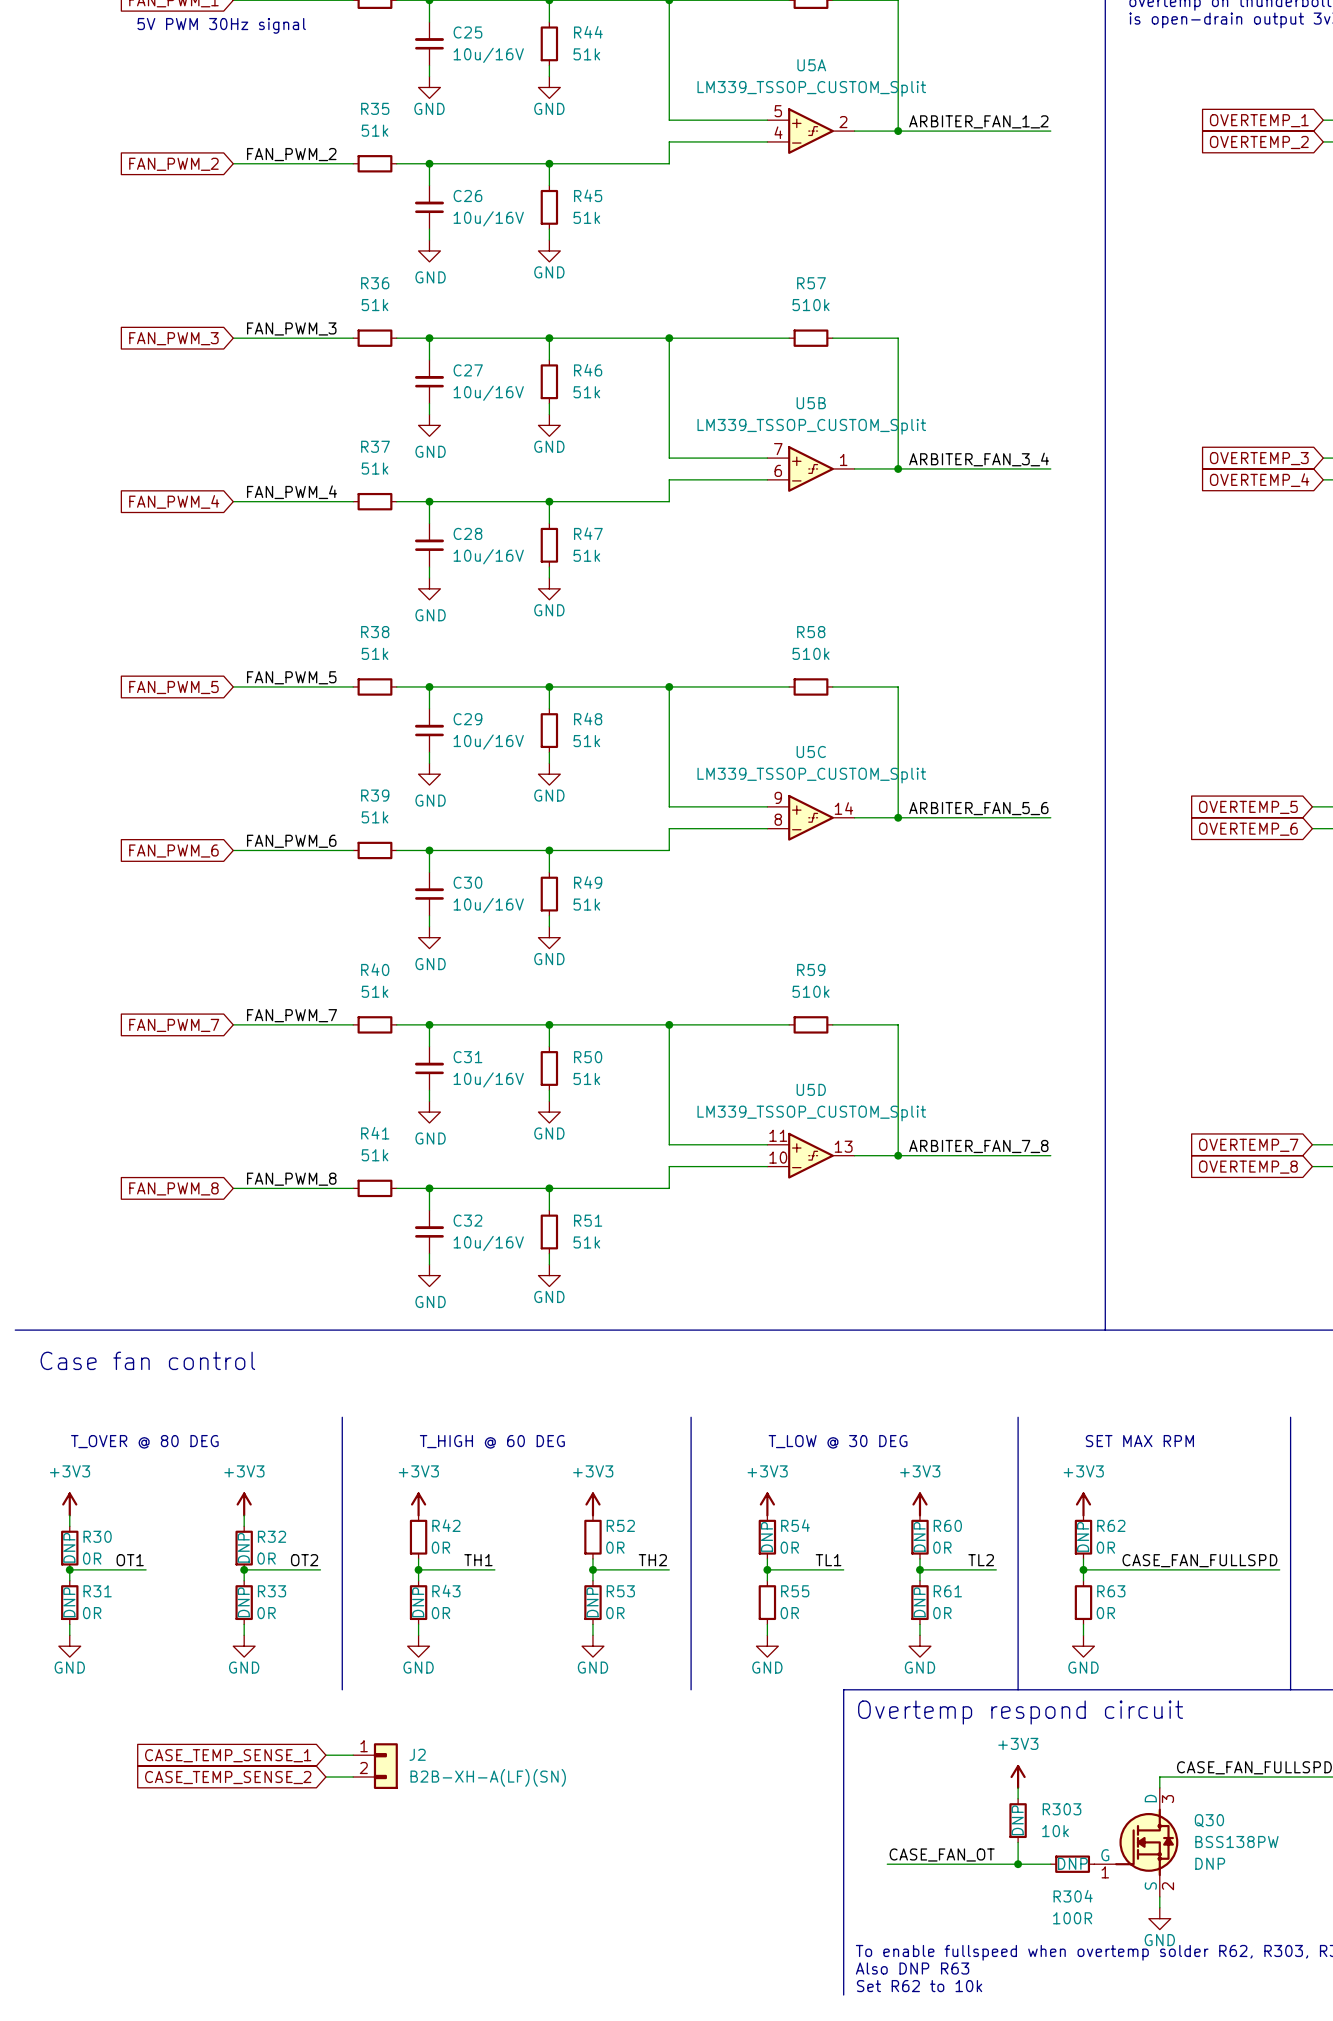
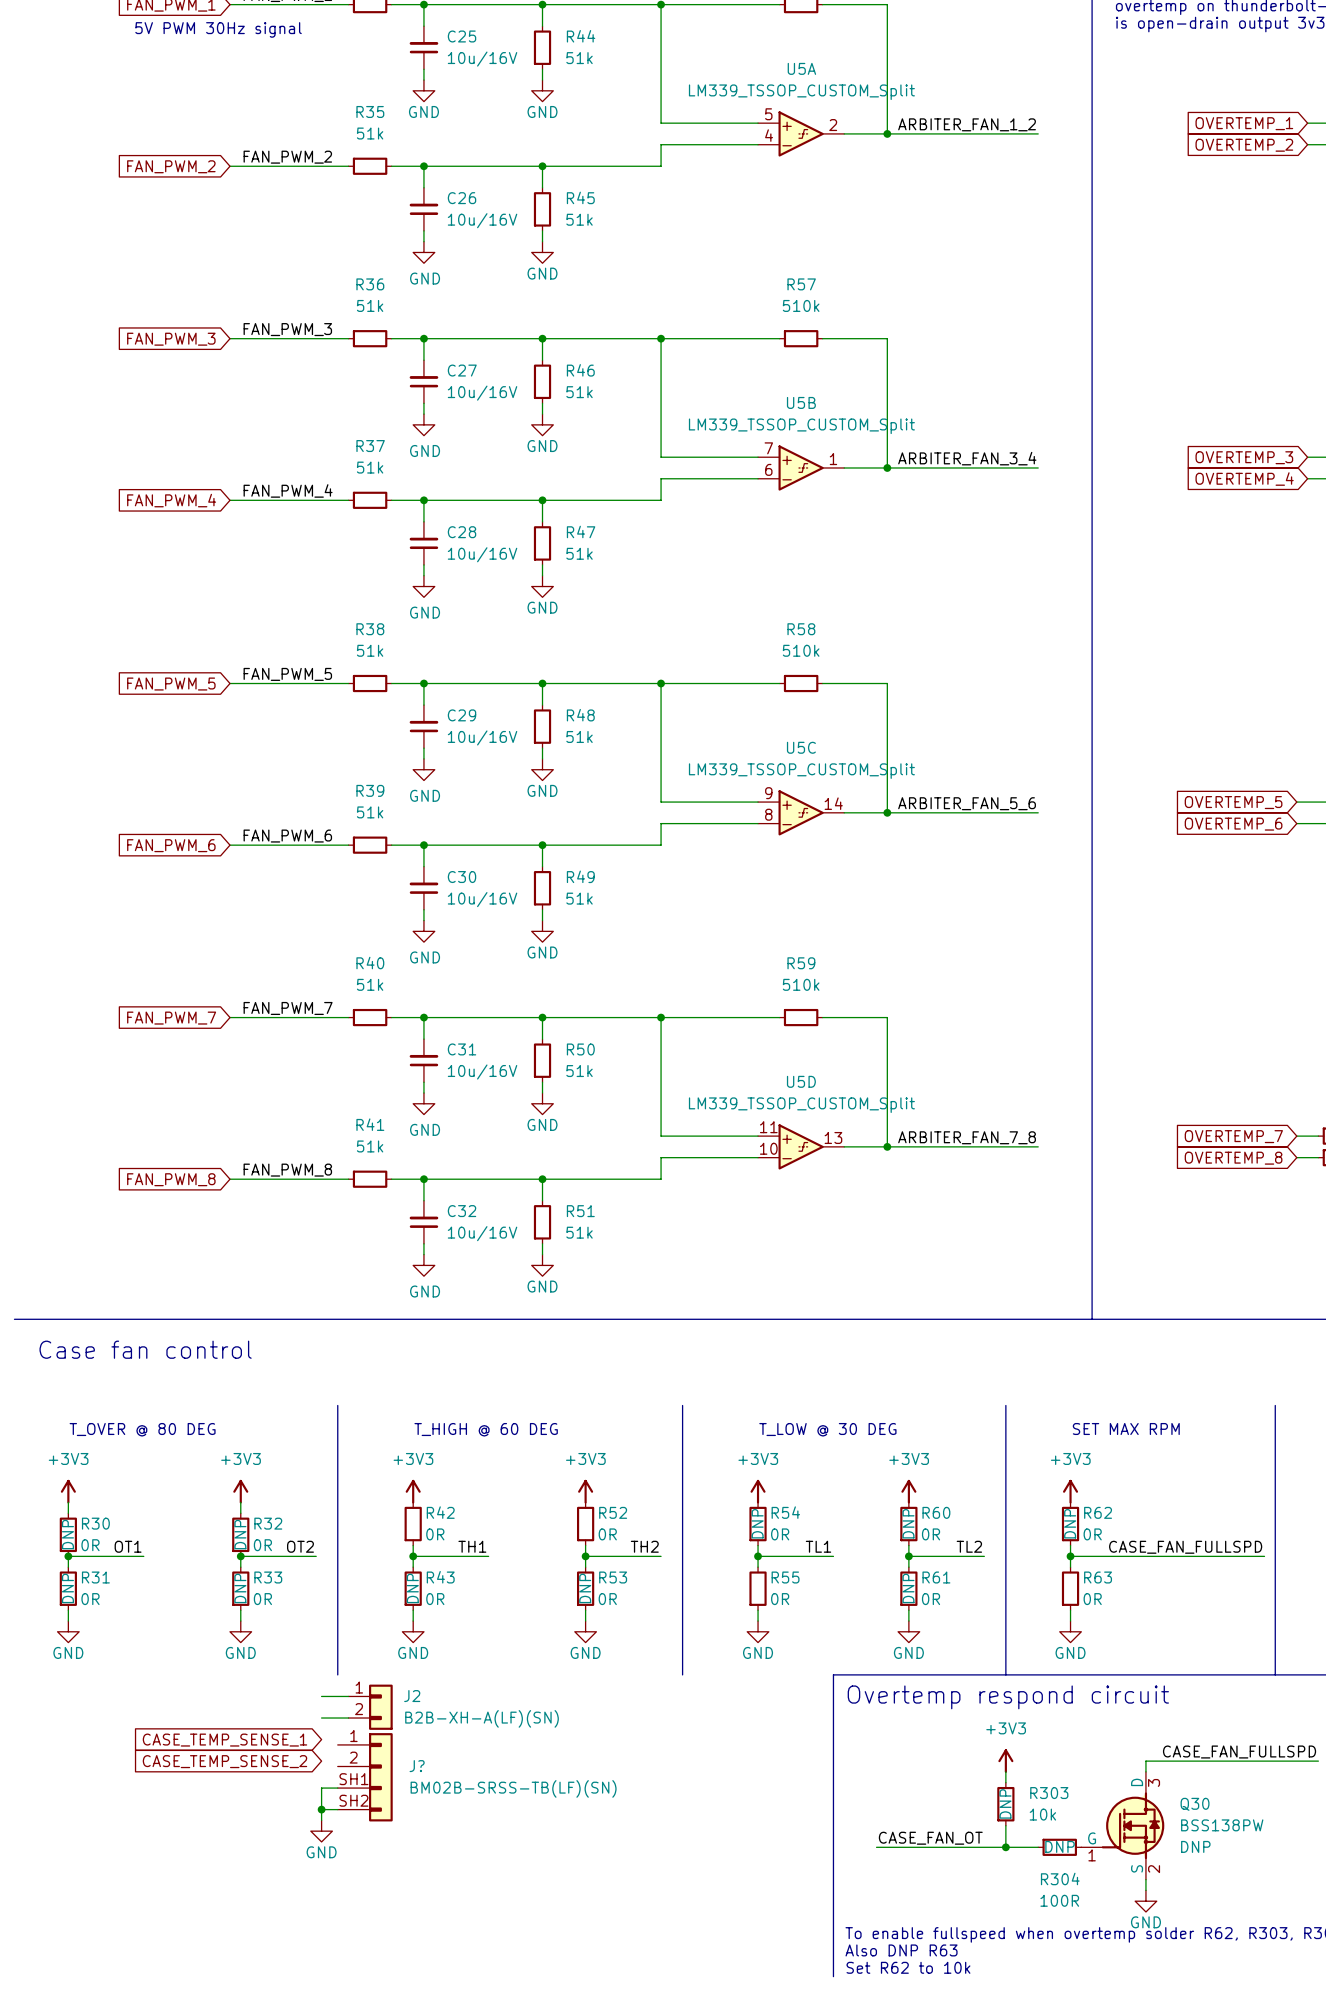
wire: (325, 1755) (353, 1755) -> (321, 1696) (348, 1696)
J2 position: (375, 1766) -> (370, 1707)
wire: (325, 1777) (353, 1777) -> (321, 1718) (348, 1718)
J?: none -> (365, 1777)
wire: none -> (337, 1788) (321, 1788) (321, 1820)
wire: none -> (321, 1809) (337, 1809)
junction: none -> (321, 1809)
power symbol: none -> GND (321, 1831)

